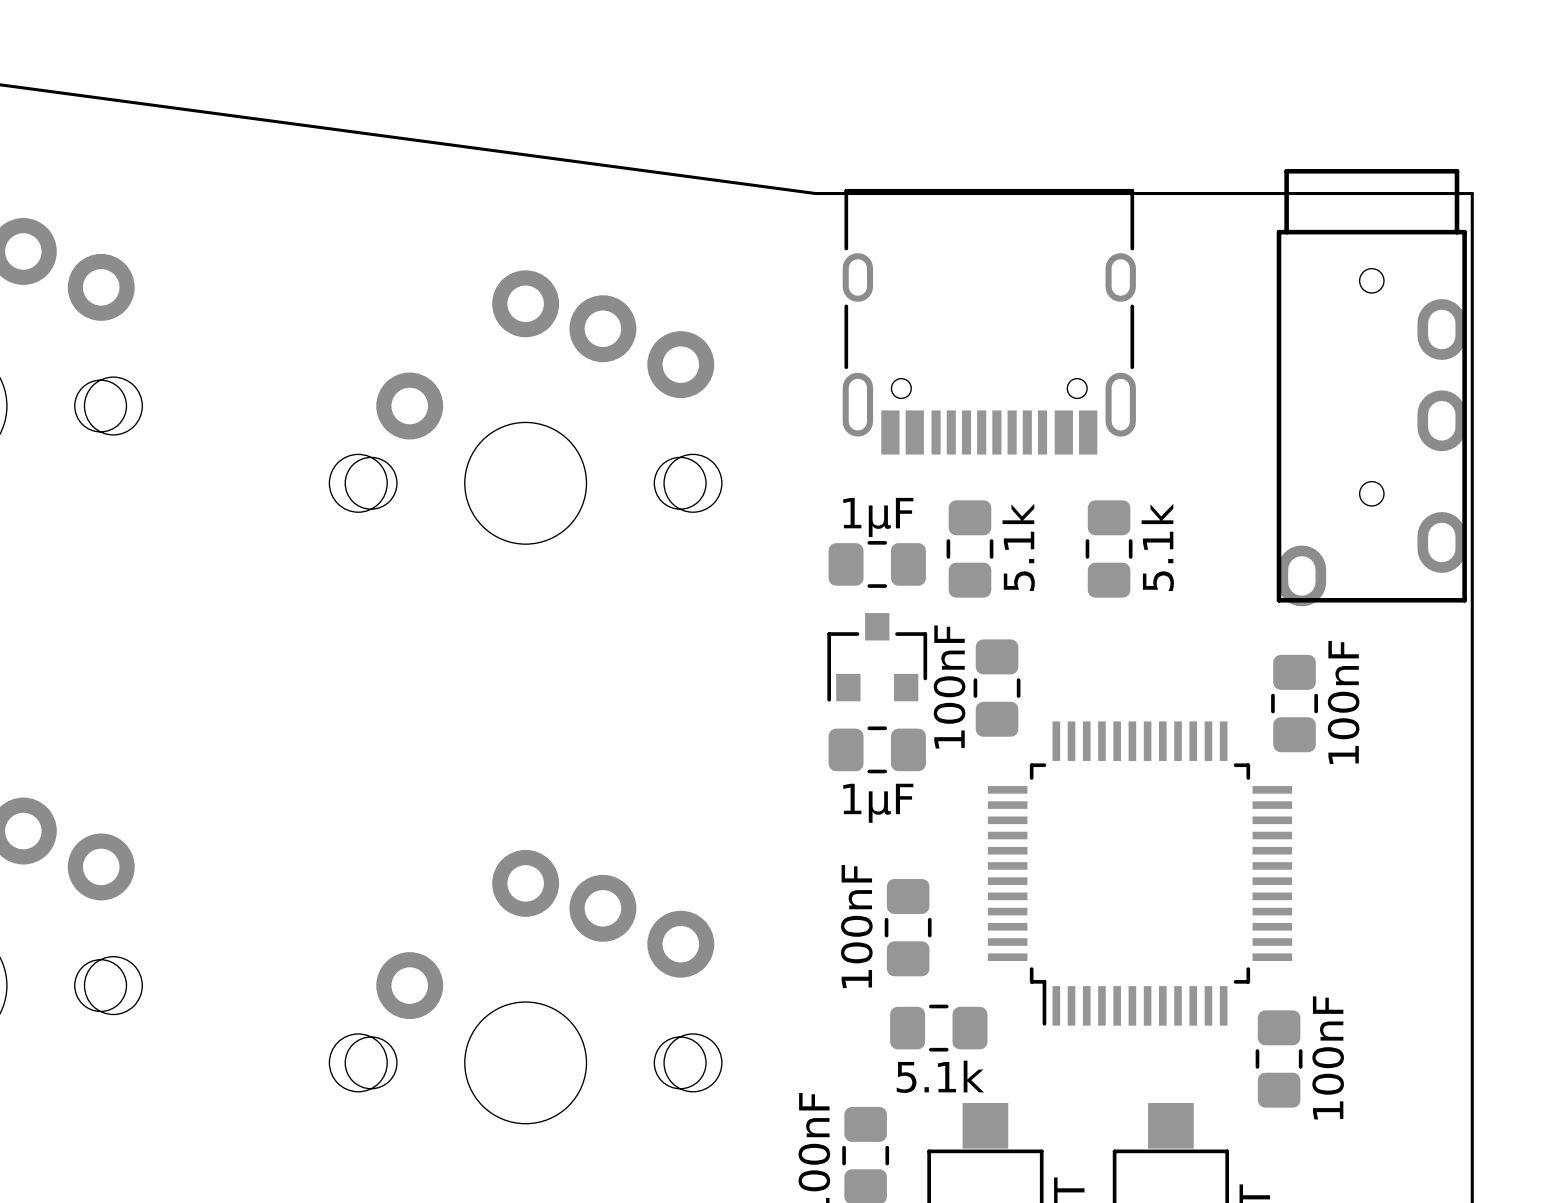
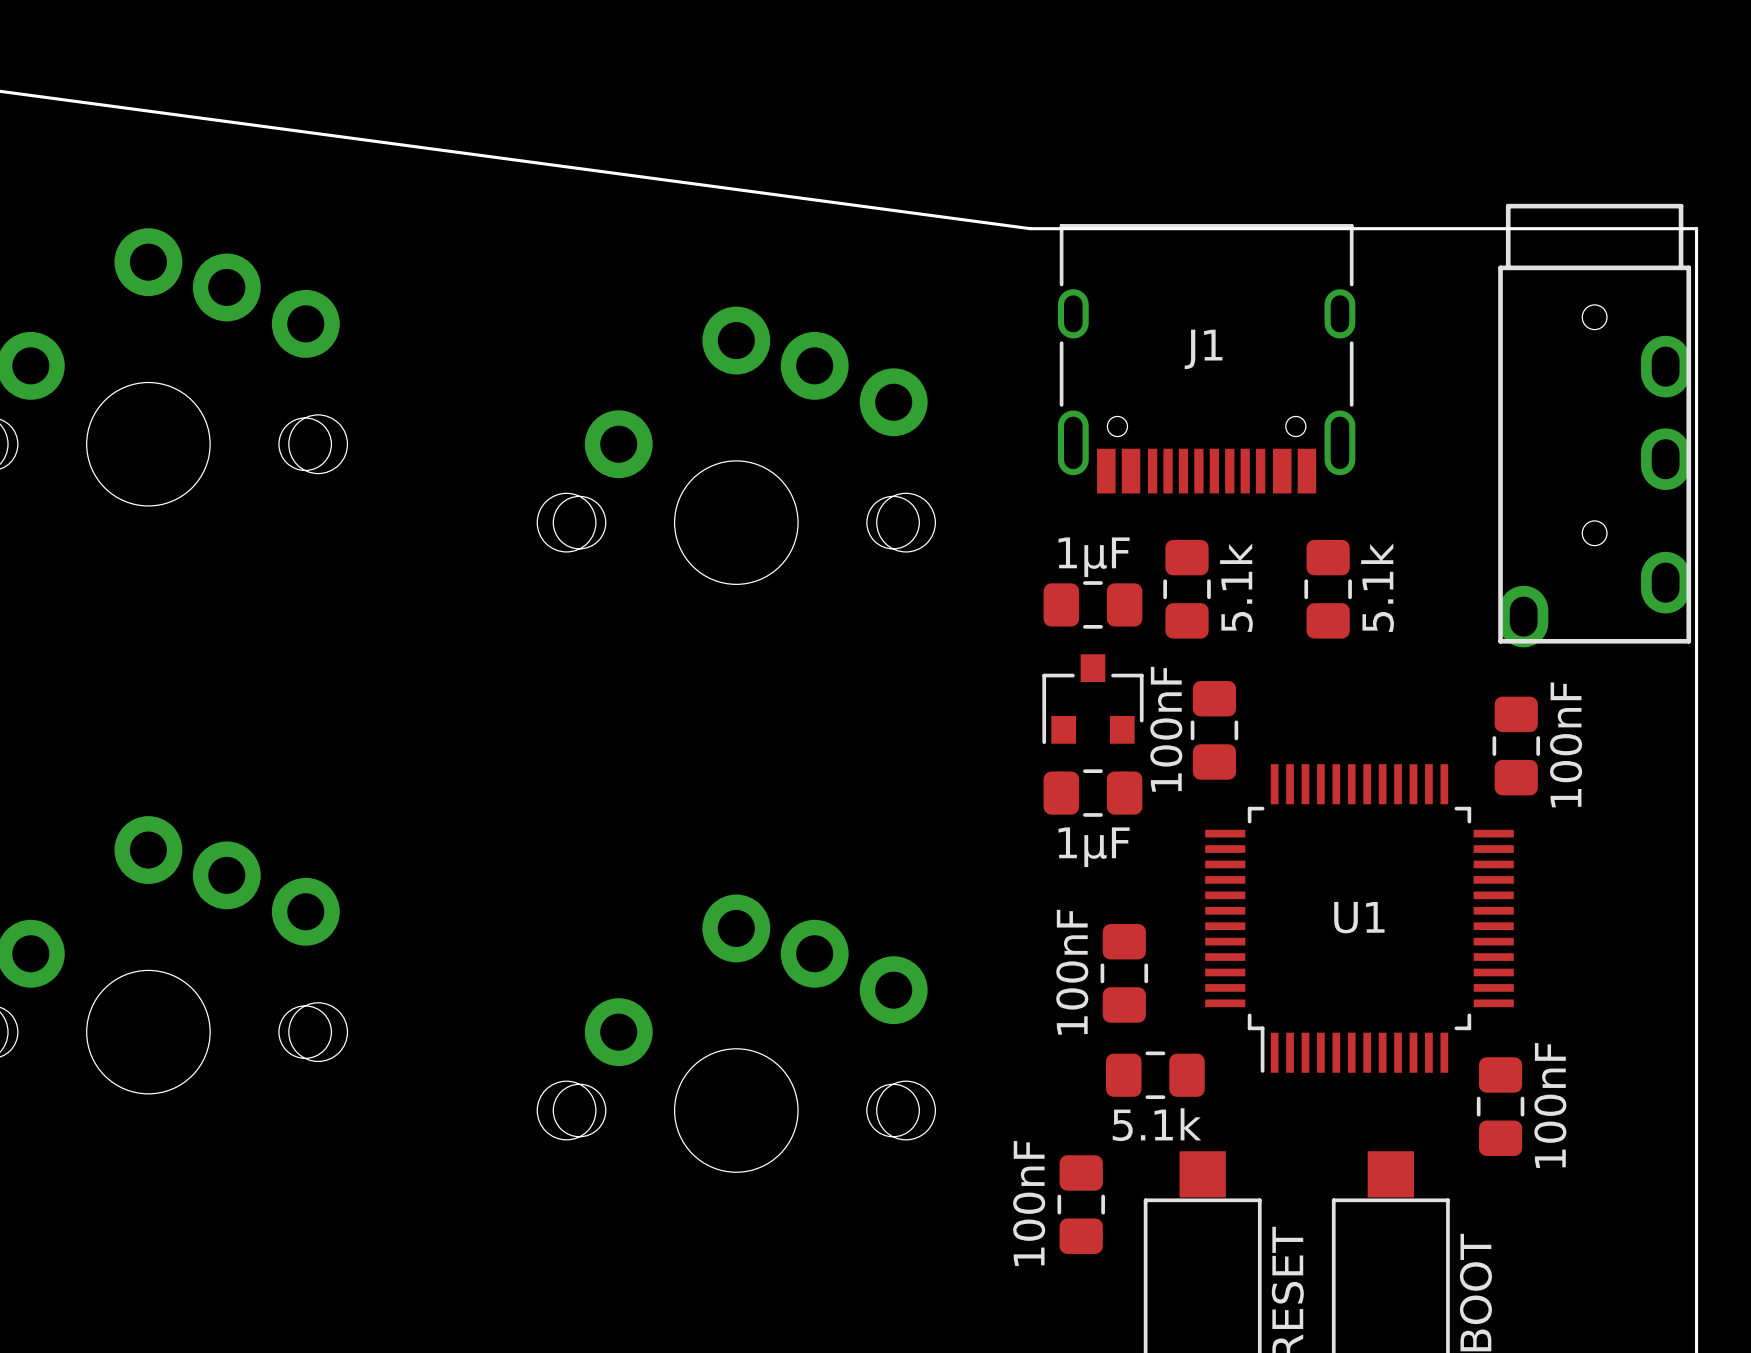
J1 name: none -> J1 (1203, 349)
U1 name: none -> U1 (1359, 917)

